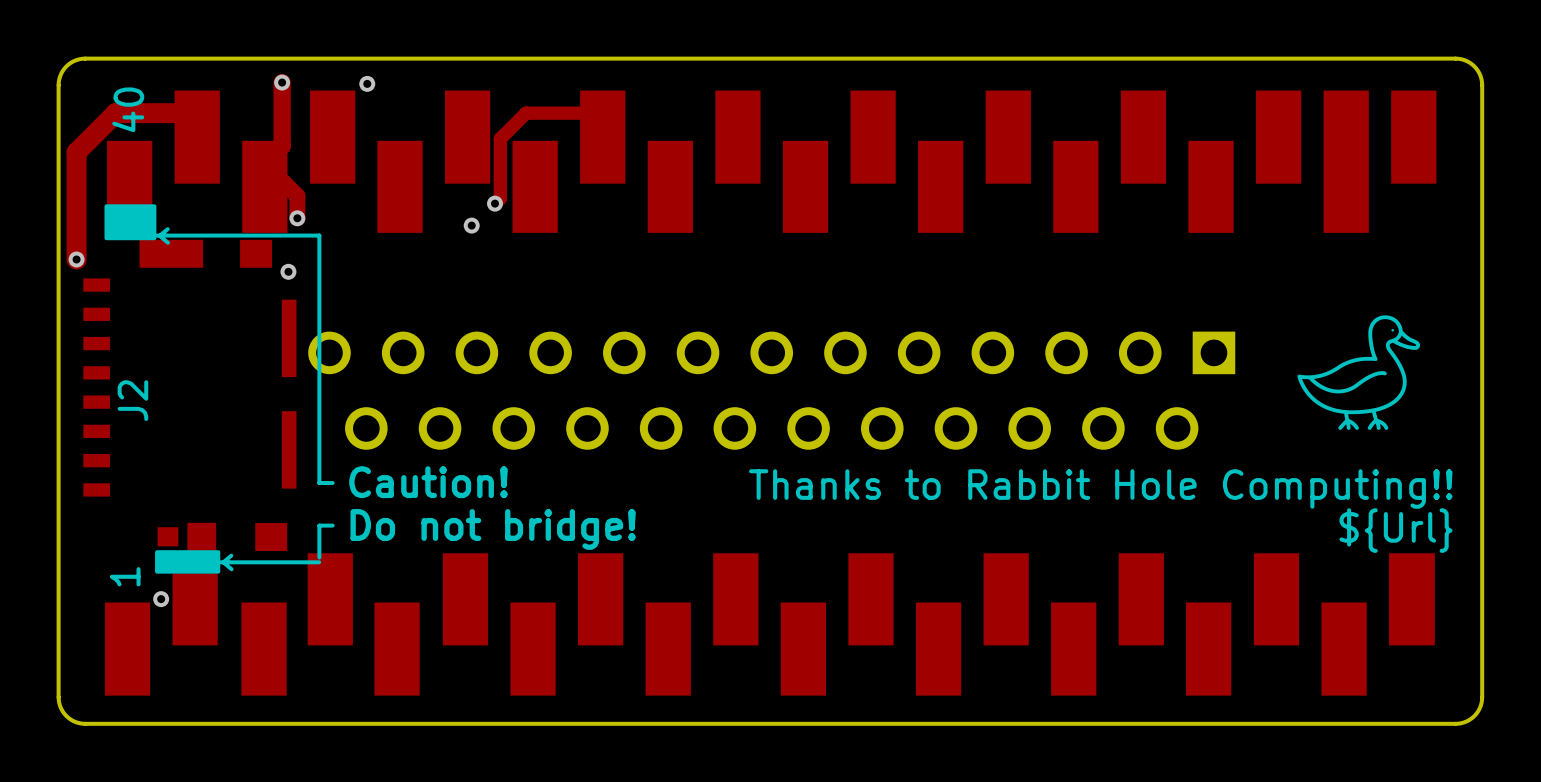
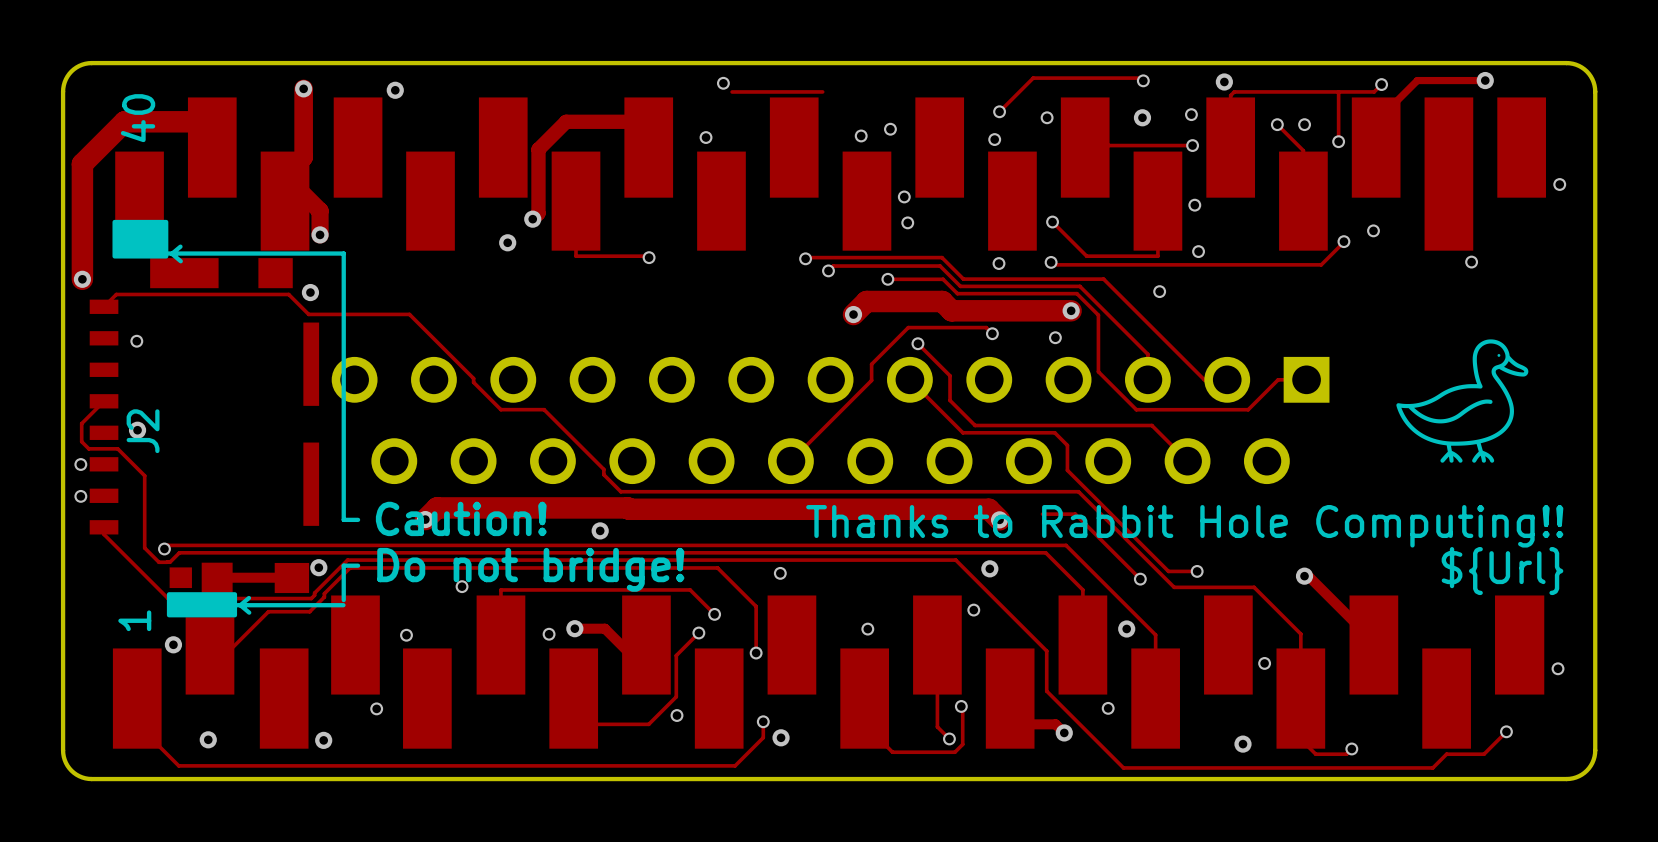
track: none -> (1143, 80) (1143, 78) (1033, 78) (999, 111)
track: none -> (1485, 80) (1417, 80) (1376, 121)
via: none -> (1485, 80)
via: none -> (1143, 80)
via: none -> (1224, 81)
via: none -> (723, 83)
track: none -> (1381, 84) (1374, 91) (1234, 91) (1230, 95) (1230, 121)
via: none -> (1381, 84)
track: none -> (732, 91) (822, 91)
track: none -> (1338, 91) (1338, 141)
via: none -> (999, 111)
via: none -> (1191, 114)
via: none -> (1047, 117)
via: none -> (1142, 117)
track: none -> (1085, 121) (1108, 145) (1192, 145)
track: none -> (1277, 124) (1303, 150) (1303, 175)
via: none -> (1277, 124)
via: none -> (1304, 124)
via: none -> (890, 129)
via: none -> (861, 135)
via: none -> (706, 137)
via: none -> (994, 139)
via: none -> (1338, 141)
via: none -> (1192, 145)
track: none -> (576, 175) (576, 256) (649, 257)
track: none -> (1157, 175) (1157, 256) (1086, 256) (1052, 222)
via: none -> (1559, 184)
via: none -> (904, 196)
via: none -> (1194, 205)
via: none -> (1052, 222)
via: none -> (907, 222)
via: none -> (1373, 230)
via: none -> (1343, 241)
track: none -> (1343, 242) (1321, 264) (1053, 264) (1051, 262)
via: none -> (1198, 251)
via: none -> (649, 257)
track: none -> (805, 258) (941, 257) (963, 279) (1103, 279) (1204, 379) (1227, 379)
via: none -> (805, 258)
via: none -> (1051, 262)
via: none -> (1471, 262)
via: none -> (998, 263)
track: none -> (828, 270) (833, 266) (940, 266) (960, 286) (1079, 286) (1147, 354) (1147, 379)
via: none -> (828, 270)
track: none -> (887, 279) (943, 279) (957, 293) (1076, 293) (1098, 315) (1098, 371) (1136, 409) (1248, 409) (1278, 379) (1306, 379)
via: none -> (887, 279)
via: none -> (1159, 291)
track: none -> (104, 306) (116, 294) (288, 294) (308, 314) (409, 314) (473, 378) (473, 382) (500, 409) (544, 409) (603, 469) (603, 474) (620, 491) (1078, 491) (1174, 587) (1254, 587) (1300, 634) (1300, 724)
track: none -> (1071, 310) (951, 310) (942, 301) (866, 301) (853, 314)
via: none -> (1071, 310)
via: none -> (853, 314)
track: none -> (992, 333) (986, 327) (908, 327) (871, 364) (871, 380) (790, 461)
via: none -> (992, 333)
via: none -> (1055, 337)
via: none -> (136, 341)
track: none -> (917, 343) (950, 375) (950, 400) (975, 425) (1151, 425) (1187, 461)
via: none -> (917, 343)
track: none -> (909, 379) (962, 432) (1054, 432) (1067, 445) (1067, 470) (1168, 571) (1197, 571)
track: none -> (104, 401) (81, 423) (81, 441) (88, 448) (117, 448) (144, 475) (144, 548) (158, 562) (167, 562)
via: none -> (137, 430)
via: none -> (80, 464)
via: none -> (80, 496)
track: none -> (1042, 514) (1075, 514) (1140, 579)
track: none -> (425, 519) (437, 507) (627, 507) (988, 509) (999, 519)
via: none -> (425, 519)
via: none -> (999, 519)
track: none -> (104, 527) (104, 534) (168, 598) (311, 598) (347, 560) (955, 560) (1046, 651) (1046, 691) (1123, 767) (1432, 767) (1446, 754) (1484, 754) (1506, 731)
via: none -> (600, 530)
track: none -> (164, 548) (168, 545) (1066, 545) (1155, 634) (1155, 724)
via: none -> (164, 548)
track: none -> (167, 561) (170, 561) (179, 552) (1045, 552) (1082, 589) (1082, 670)
via: none -> (318, 567)
via: none -> (989, 568)
via: none -> (1197, 571)
via: none -> (780, 573)
track: none -> (1304, 576) (1308, 576) (1373, 641)
via: none -> (1304, 576)
track: none -> (217, 577) (291, 577)
via: none -> (1140, 579)
via: none -> (462, 586)
via: none -> (973, 610)
track: none -> (714, 614) (690, 589) (500, 589) (500, 670)
via: none -> (714, 614)
track: none -> (574, 628) (604, 628) (646, 670)
via: none -> (574, 628)
via: none -> (867, 629)
via: none -> (1126, 628)
track: none -> (698, 632) (676, 655) (676, 696) (648, 724) (573, 724)
via: none -> (698, 632)
via: none -> (549, 634)
via: none -> (406, 635)
track: none -> (756, 653) (756, 606) (717, 567) (350, 567) (309, 611) (268, 611) (209, 670)
via: none -> (756, 653)
via: none -> (1264, 663)
via: none -> (1558, 668)
track: none -> (937, 670) (937, 726) (949, 738)
track: none -> (961, 706) (962, 744) (954, 752) (892, 752) (864, 724)
via: none -> (961, 706)
via: none -> (376, 708)
via: none -> (1108, 708)
via: none -> (676, 715)
track: none -> (763, 721) (763, 737) (735, 765) (178, 765) (137, 724)
via: none -> (763, 721)
track: none -> (1010, 724) (1055, 724) (1064, 732)
via: none -> (1506, 731)
via: none -> (1064, 732)
via: none -> (781, 737)
via: none -> (949, 738)
track: none -> (1300, 739) (1315, 754) (1346, 754) (1351, 748)
via: none -> (208, 739)
via: none -> (323, 740)
via: none -> (1242, 744)
via: none -> (1351, 748)

